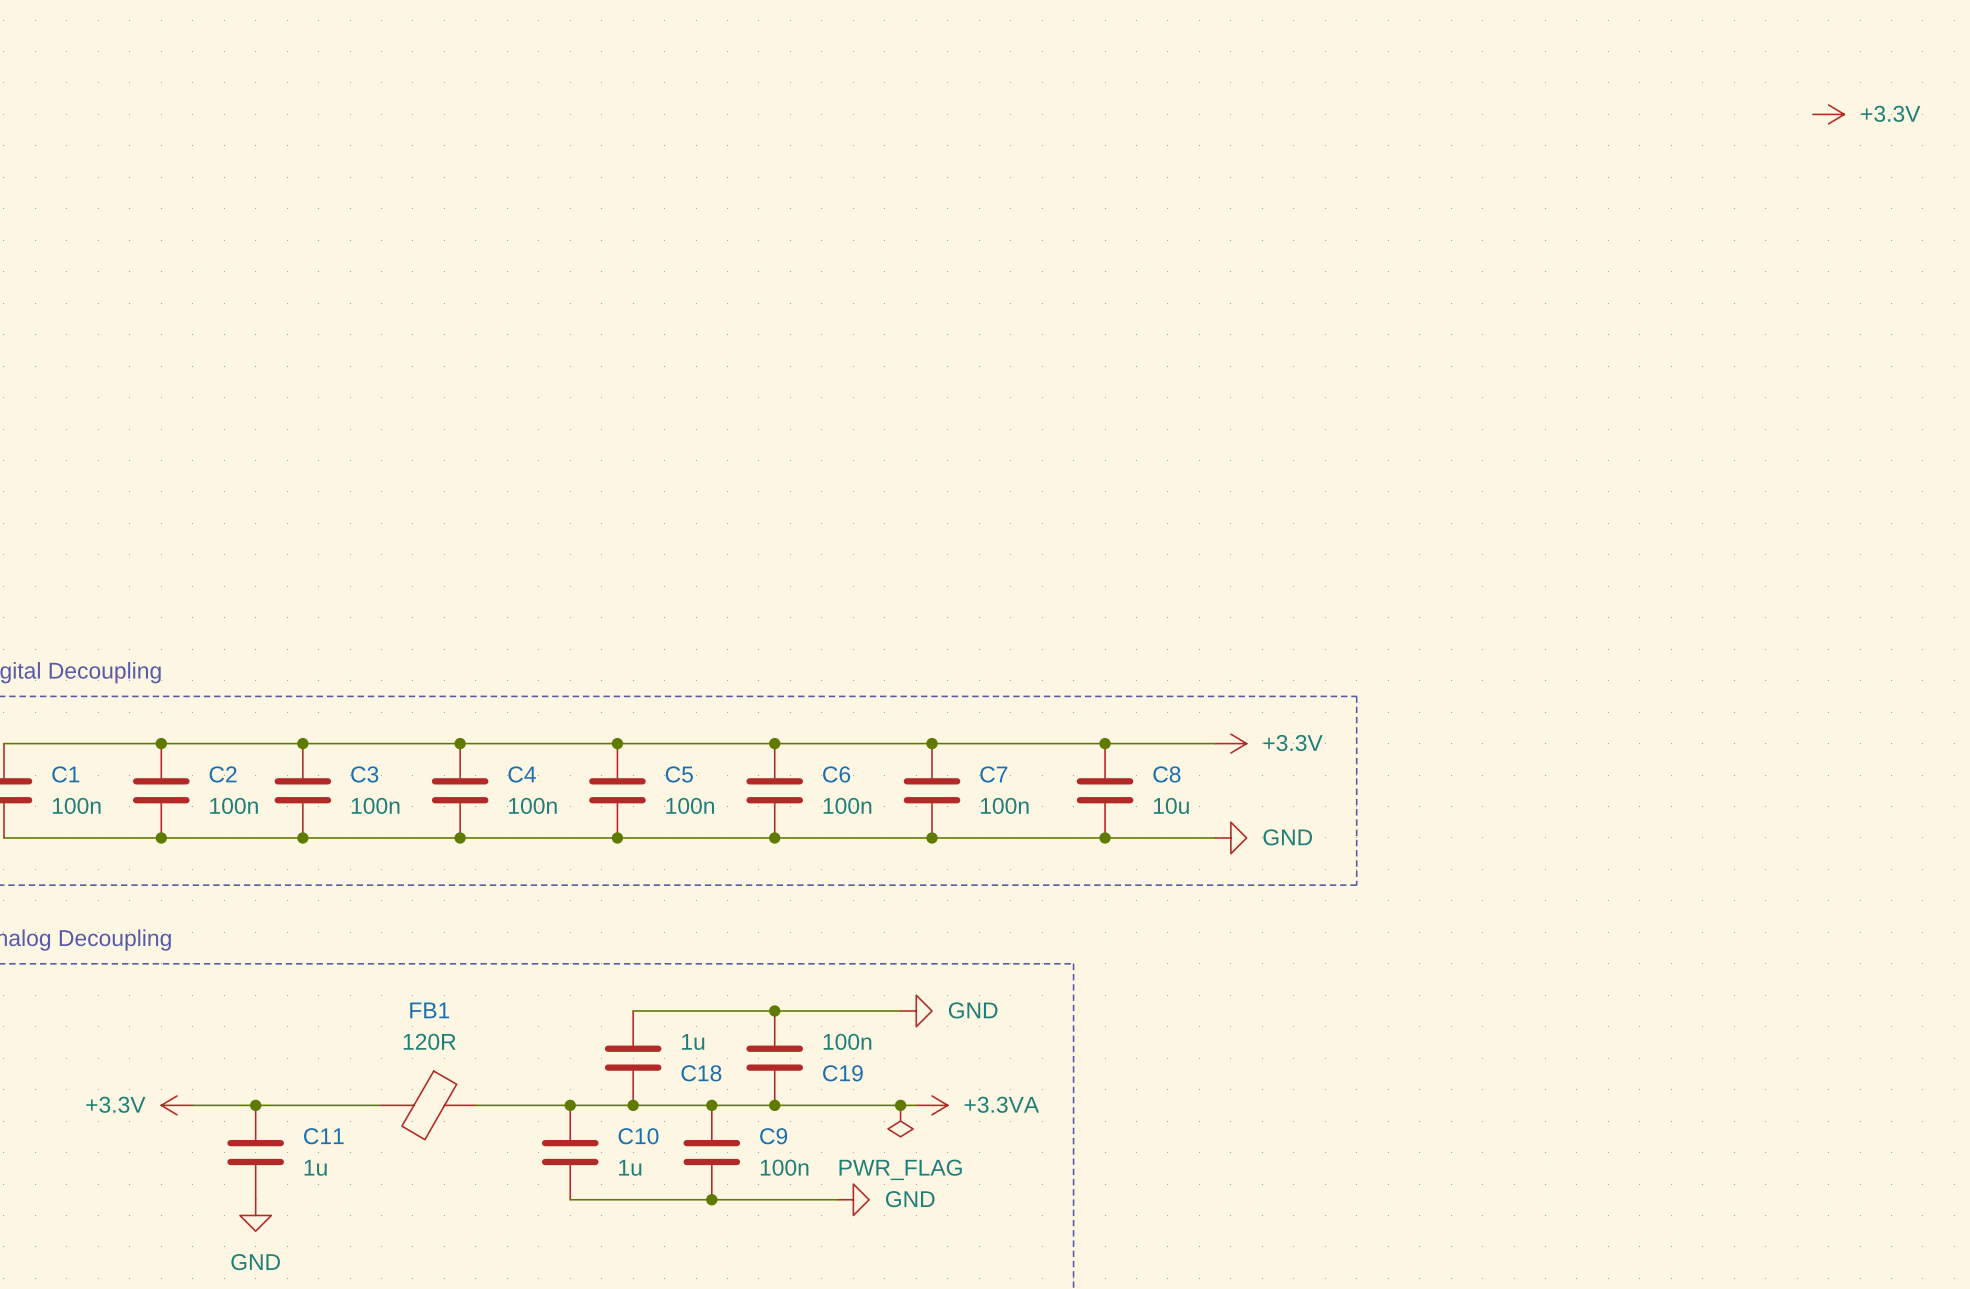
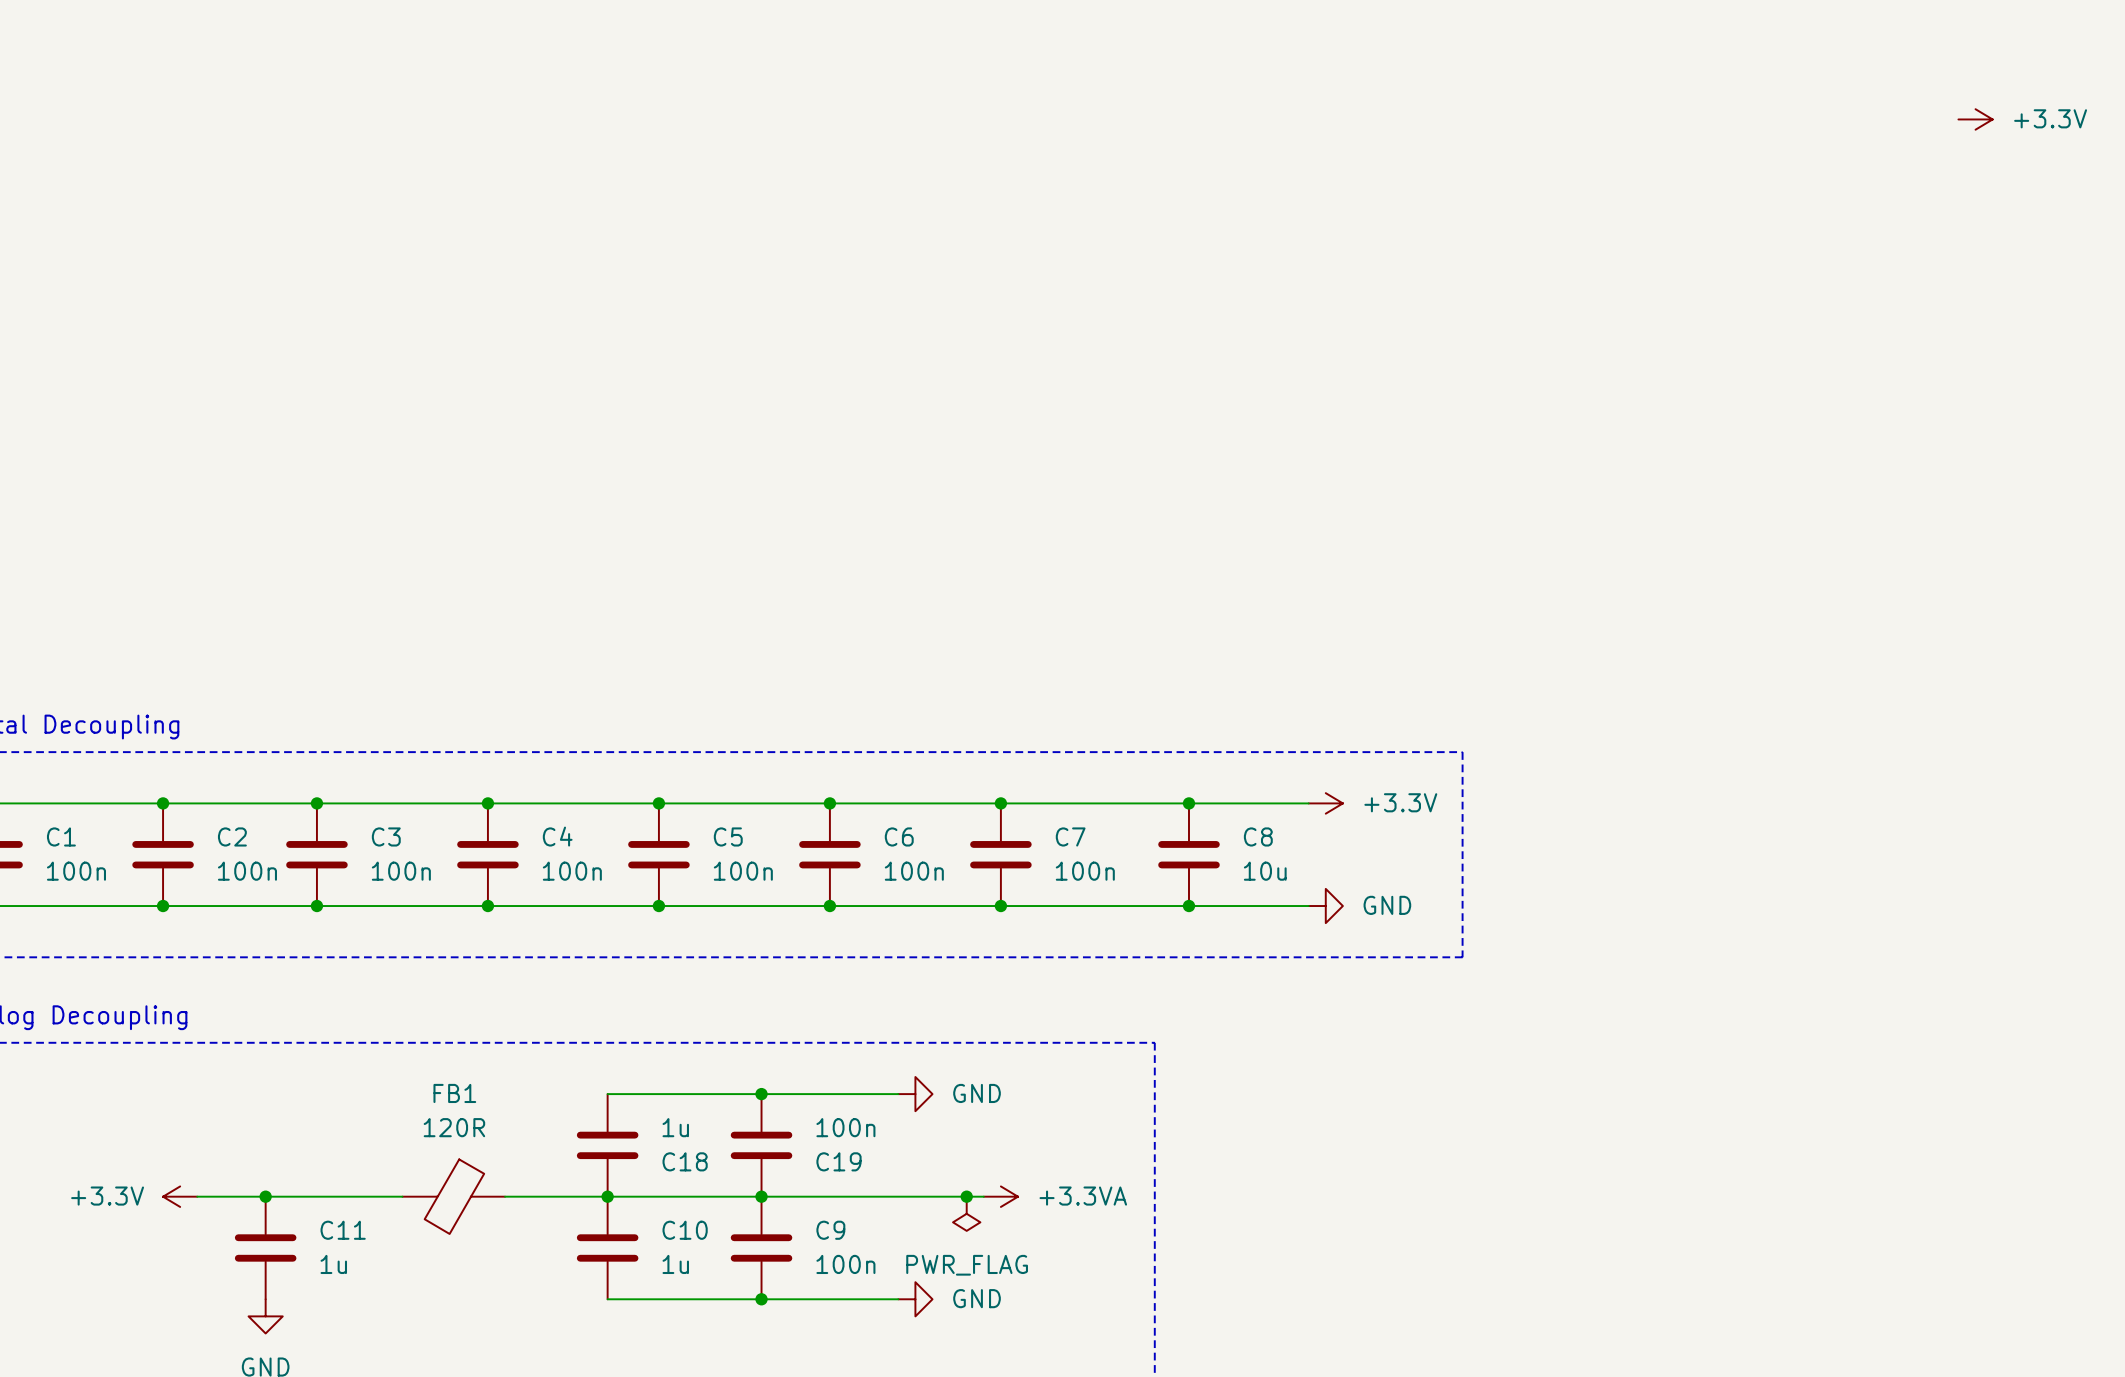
junction: none -> (761, 1094)
junction: (774, 1010) -> none
wire: (837, 1010) (900, 1010) -> (607, 1094) (676, 1094)
power symbol position: GND (916, 1010) -> GND (915, 1094)
C18 position: (633, 1058) -> (607, 1145)
C19 position: (774, 1058) -> (761, 1145)
junction: (633, 1105) -> none
junction: (774, 1105) -> none

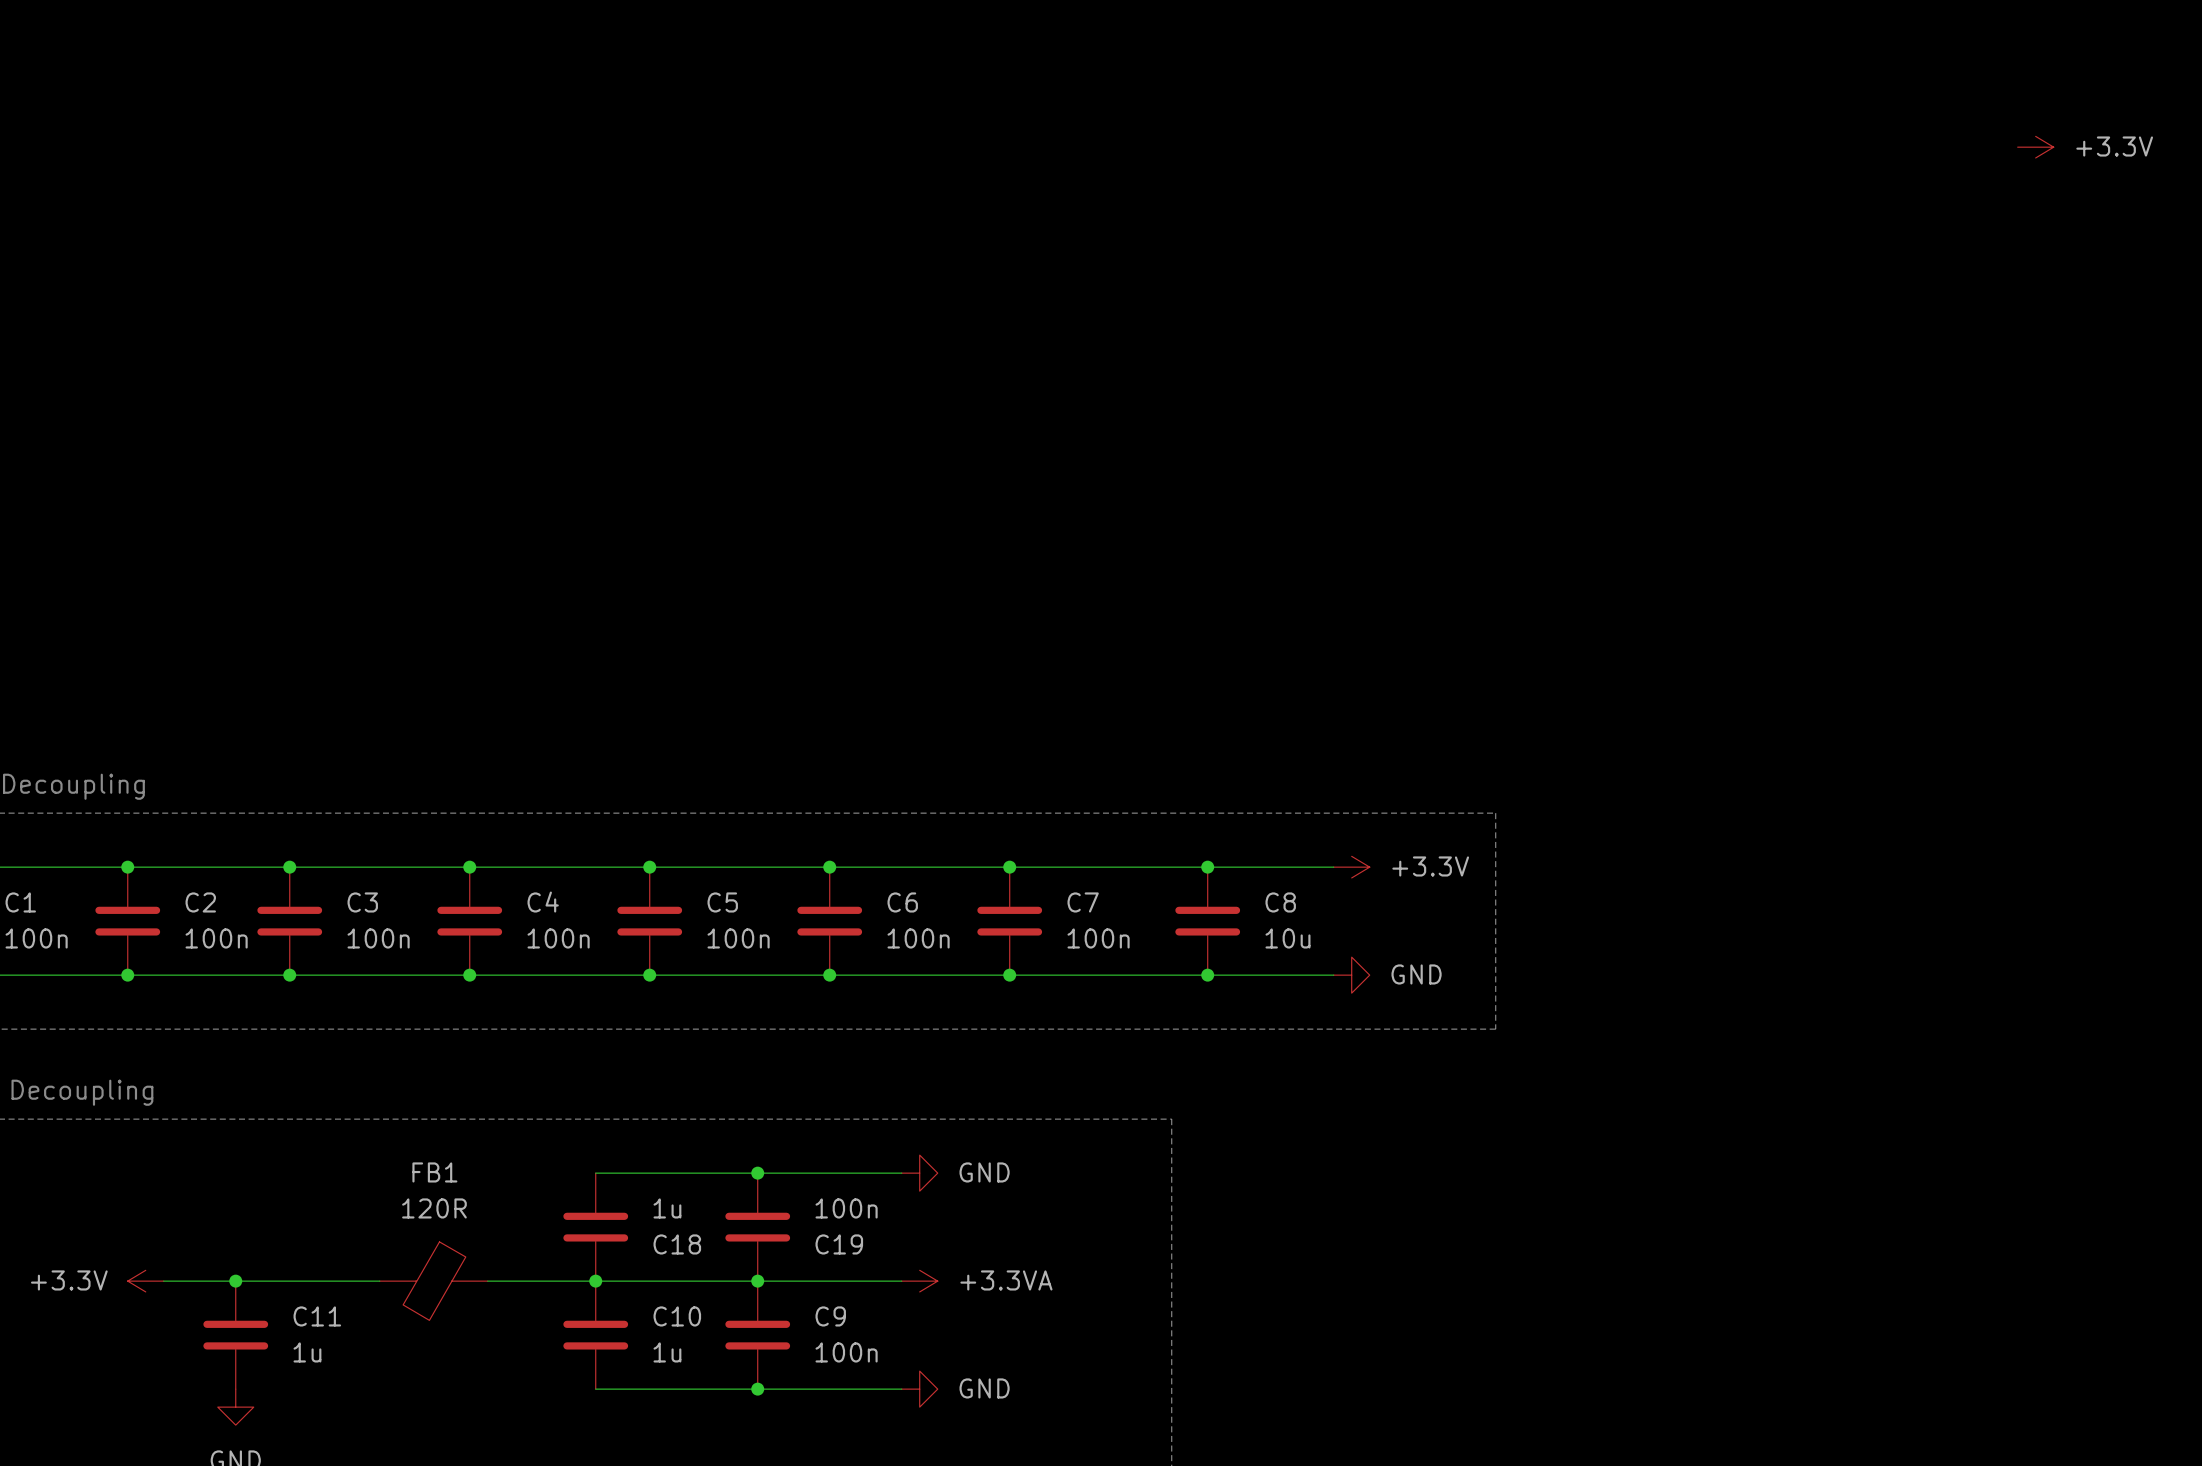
wire: (898, 1196) (983, 1196) -> none
junction: (966, 1196) -> none
power symbol position: +3.3VA (1000, 1196) -> +3.3VA (919, 1281)
power symbol: PWR_FLAG (966, 1213) -> none

